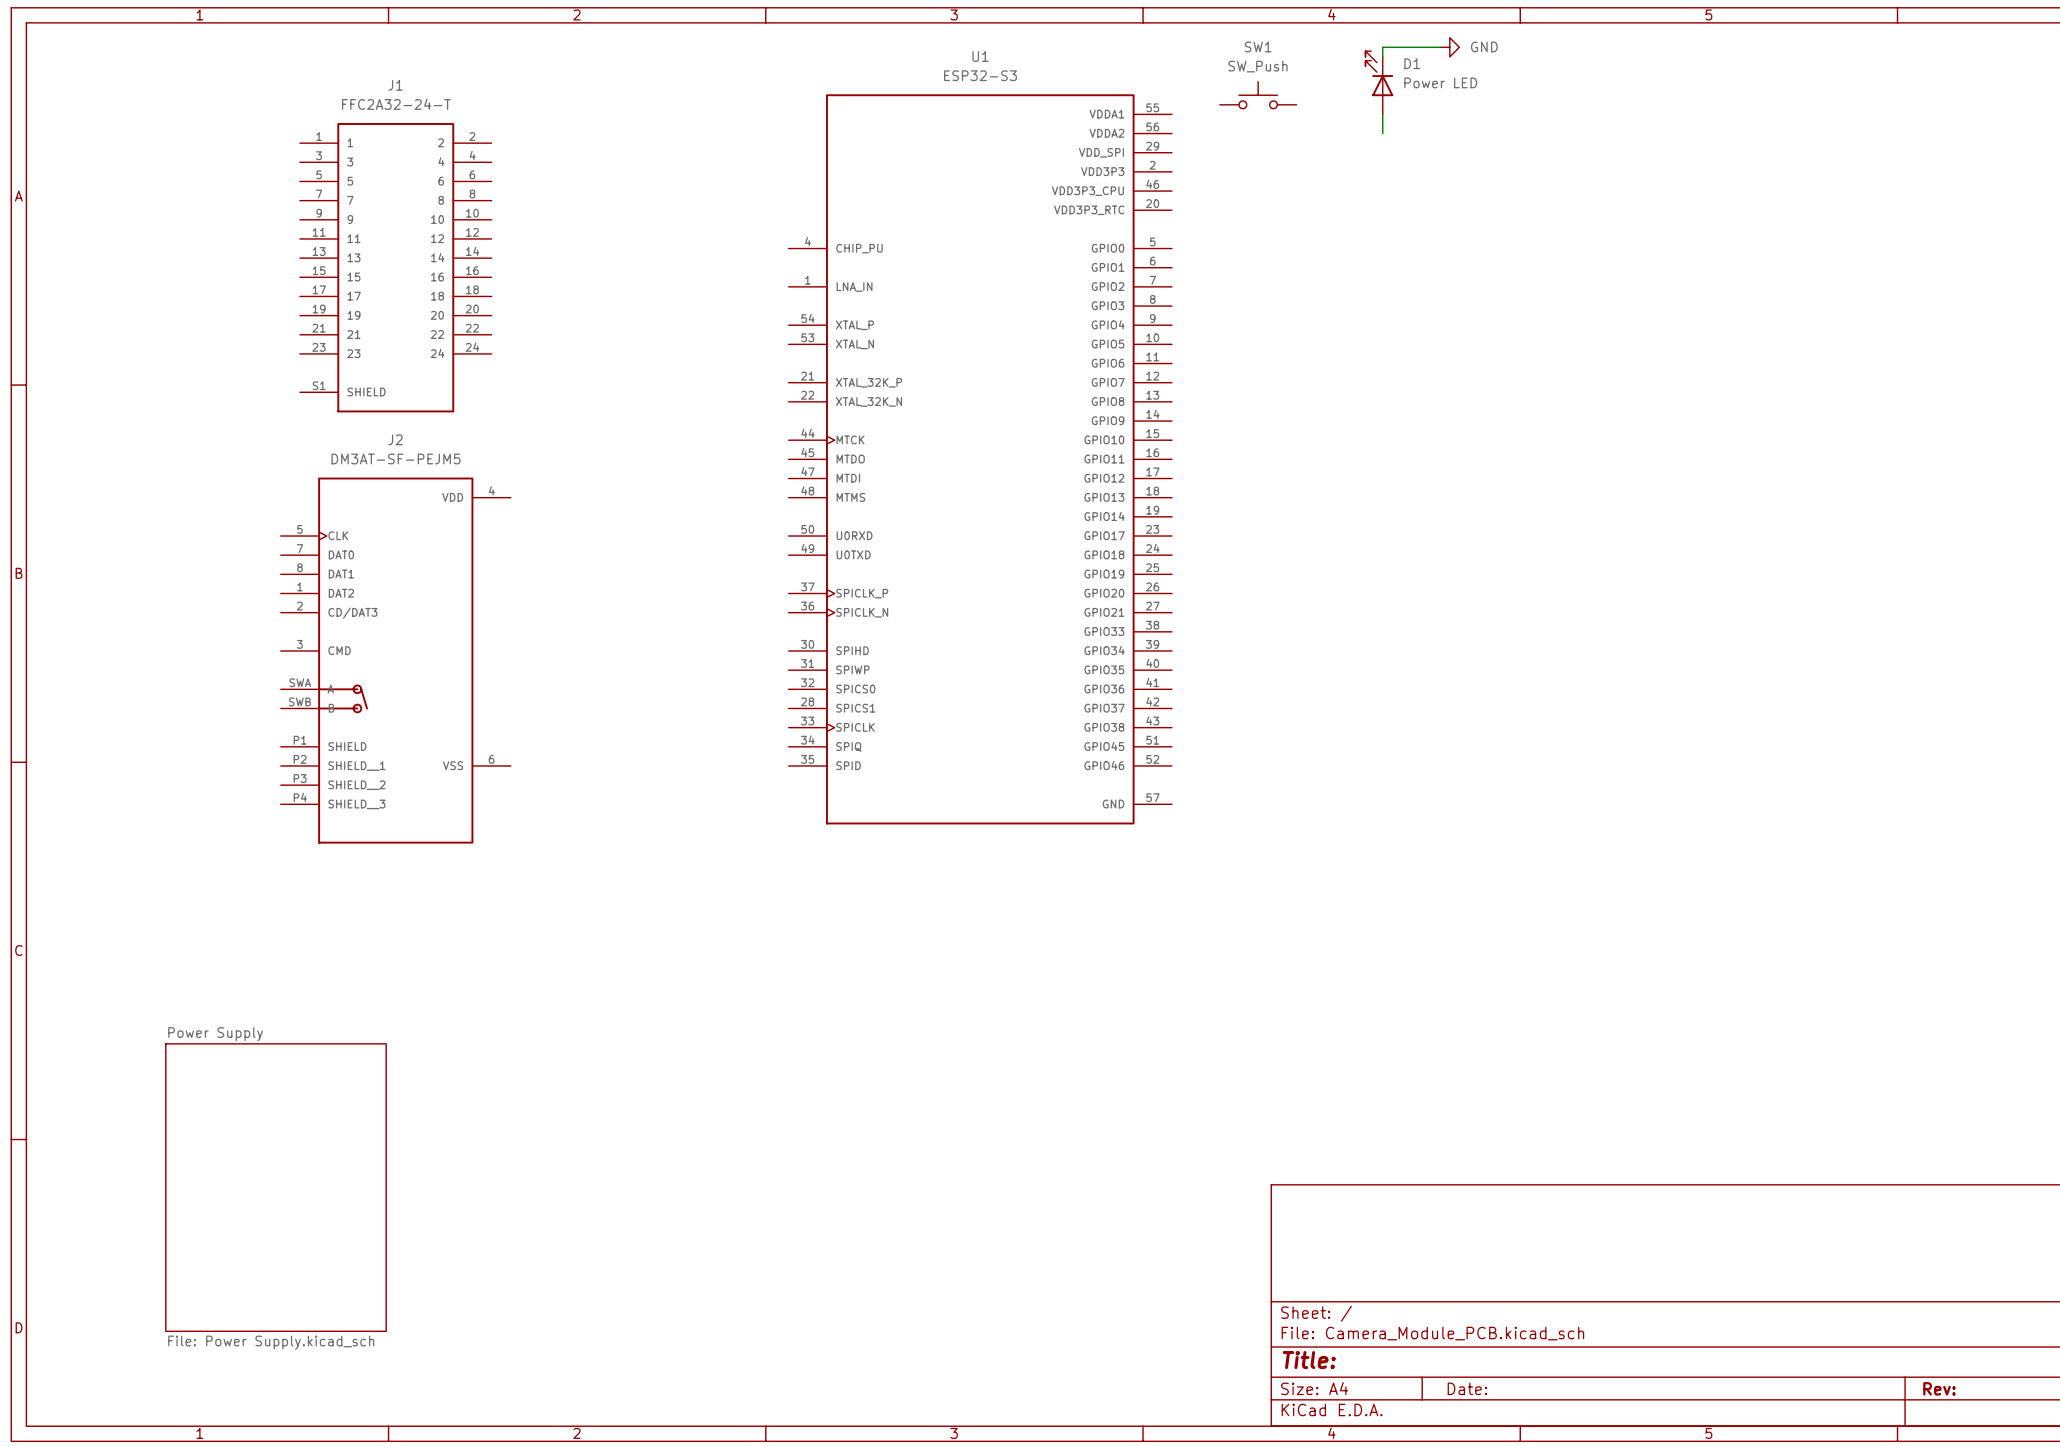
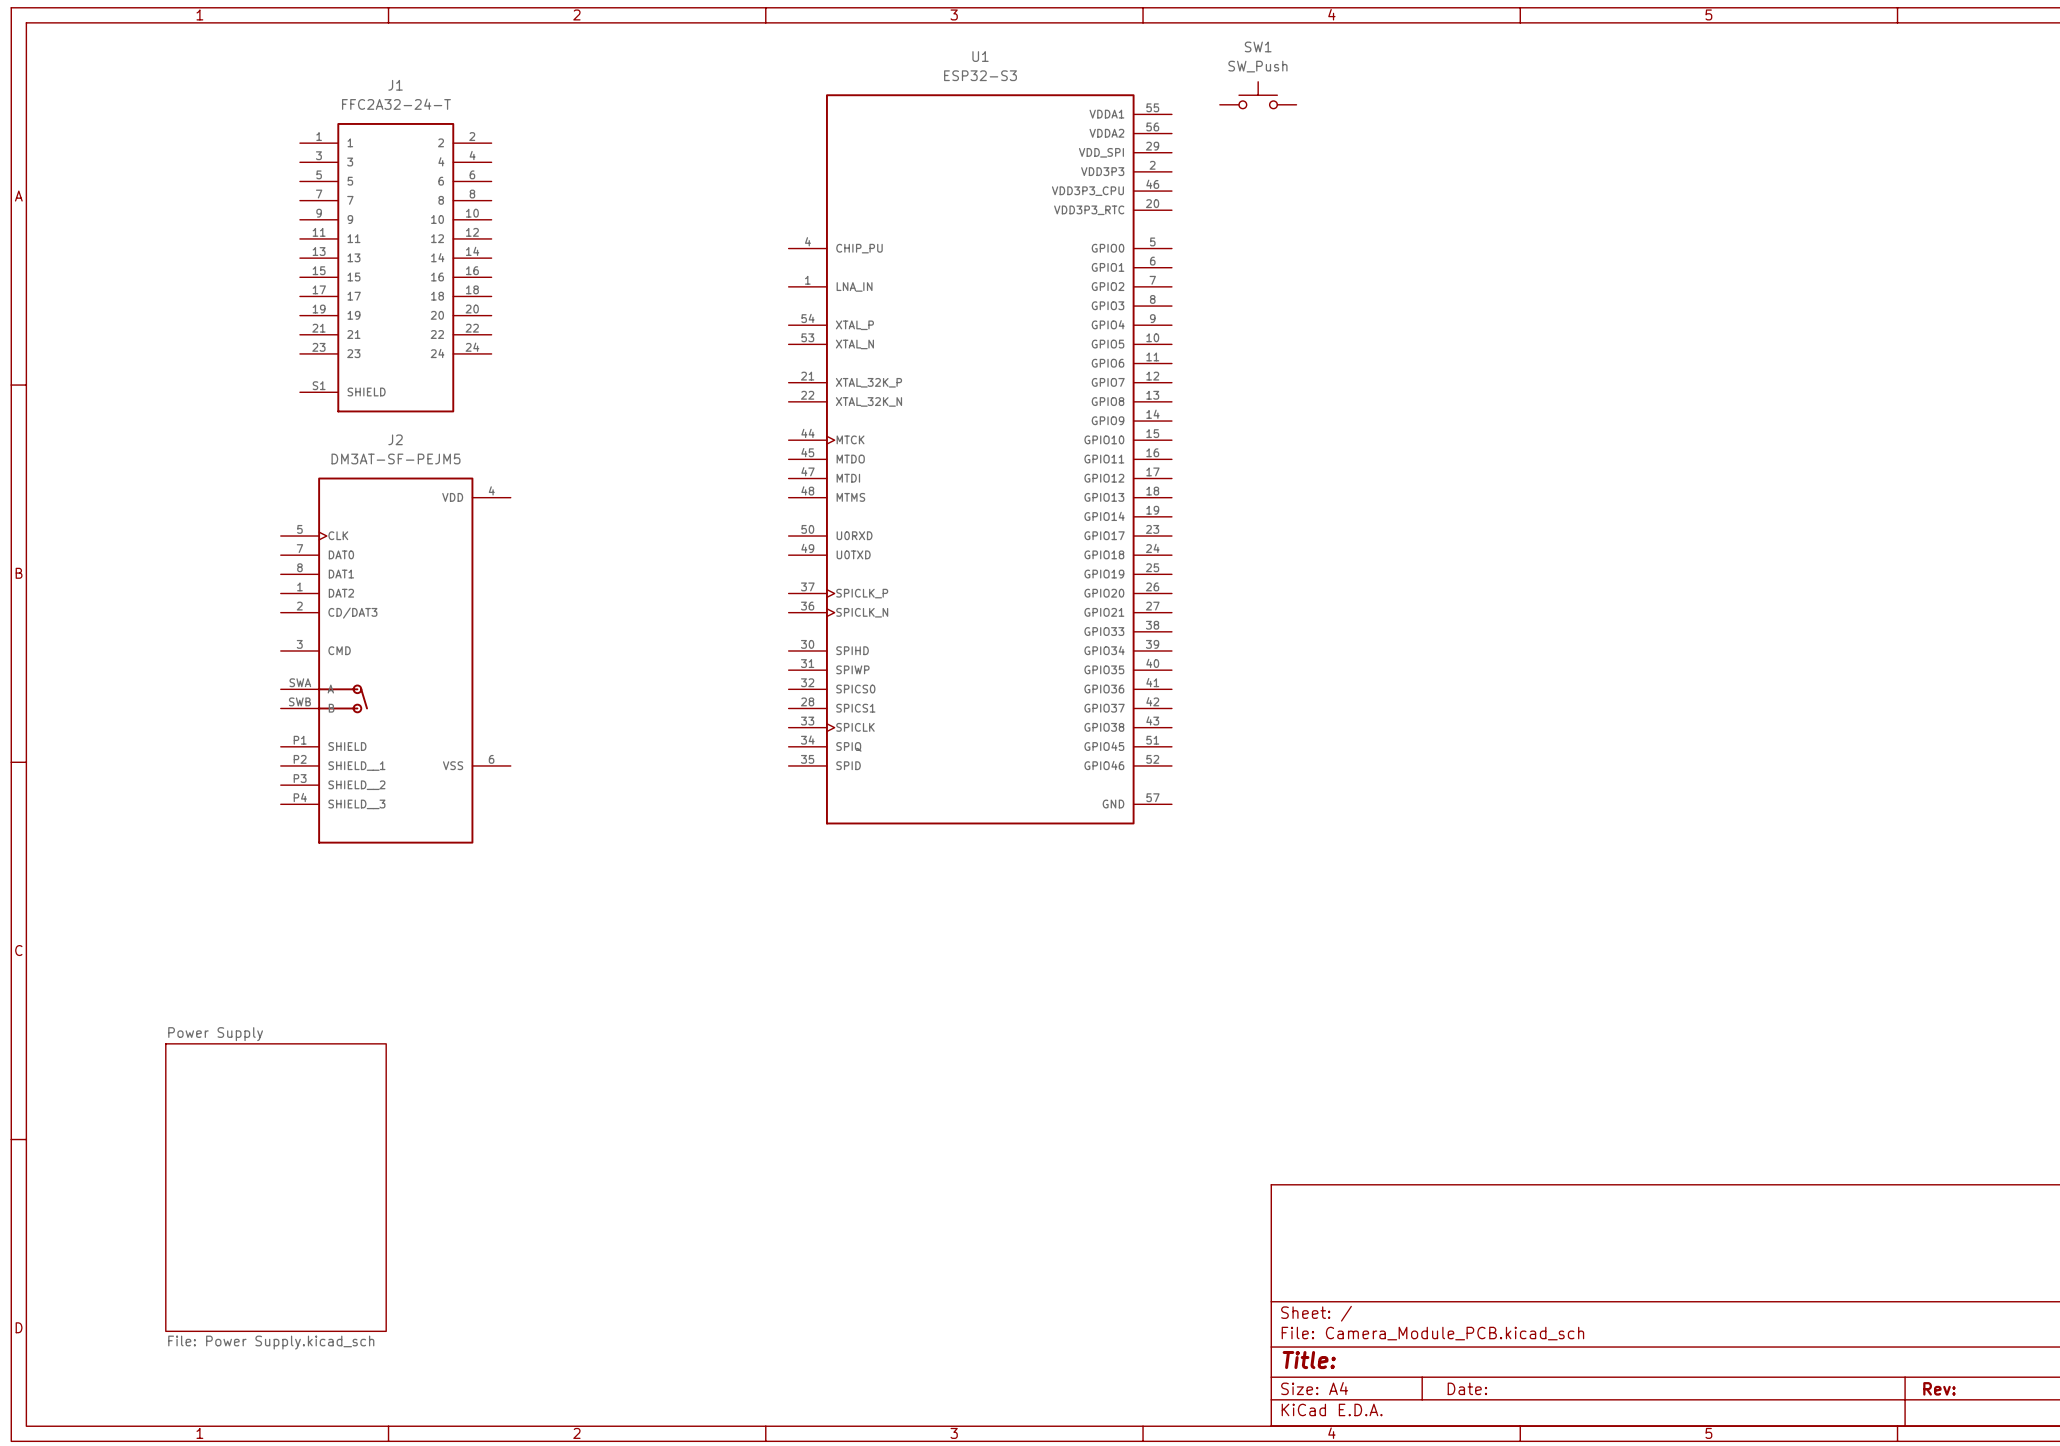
wire: (1440, 47) (1382, 47) (1382, 56) -> none
power symbol: GND (1449, 47) -> none
D1: Power LED (1379, 82) -> none
wire: (1382, 114) (1382, 133) -> none

